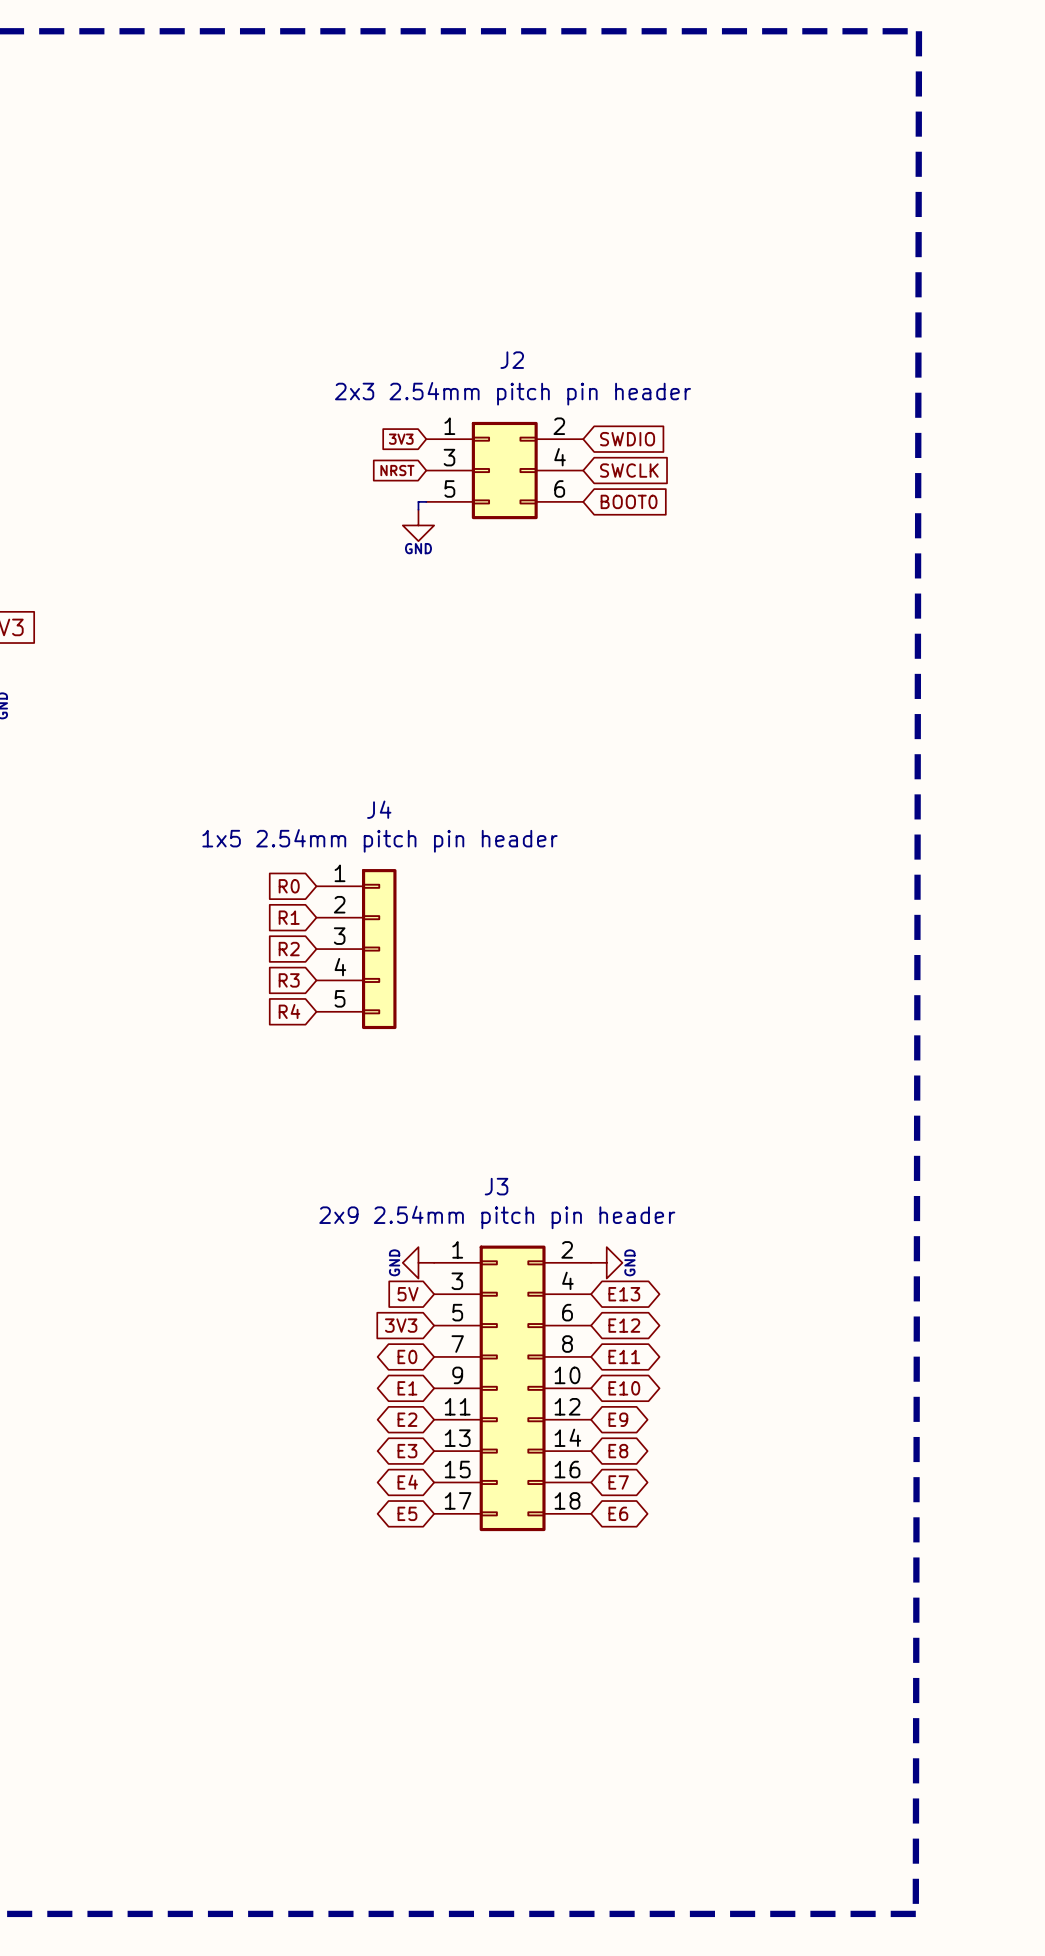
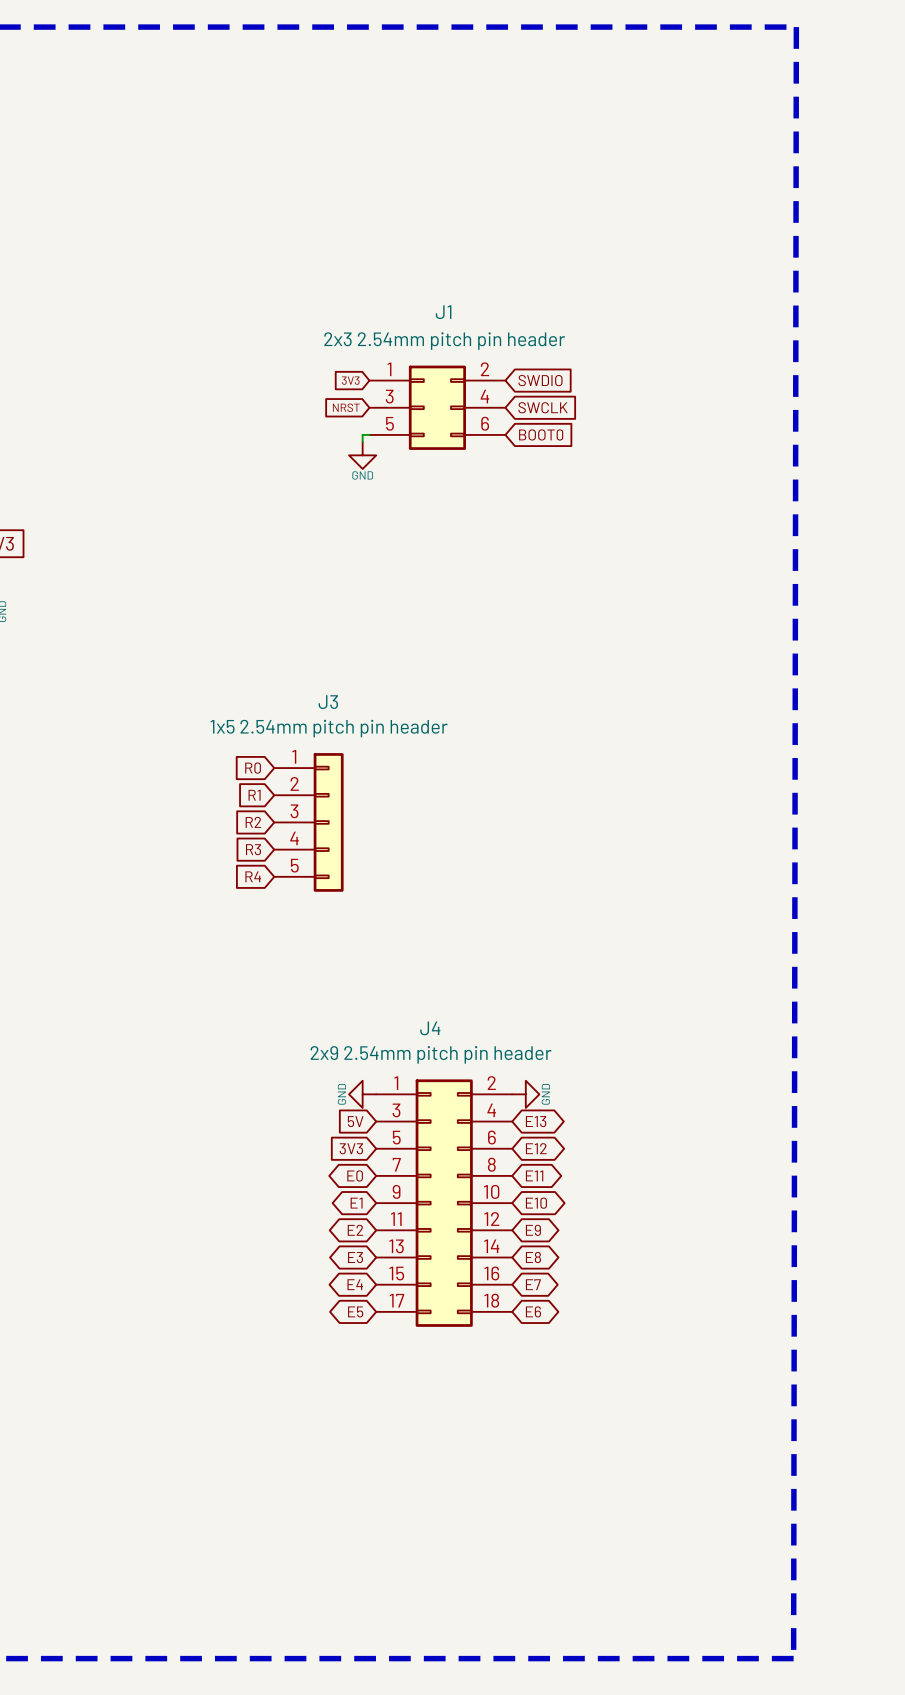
J2 name: J2 (512, 360) -> J1 (443, 312)
J4 name: J4 (379, 809) -> J3 (328, 702)
J3 name: J3 (496, 1186) -> J4 (430, 1028)

